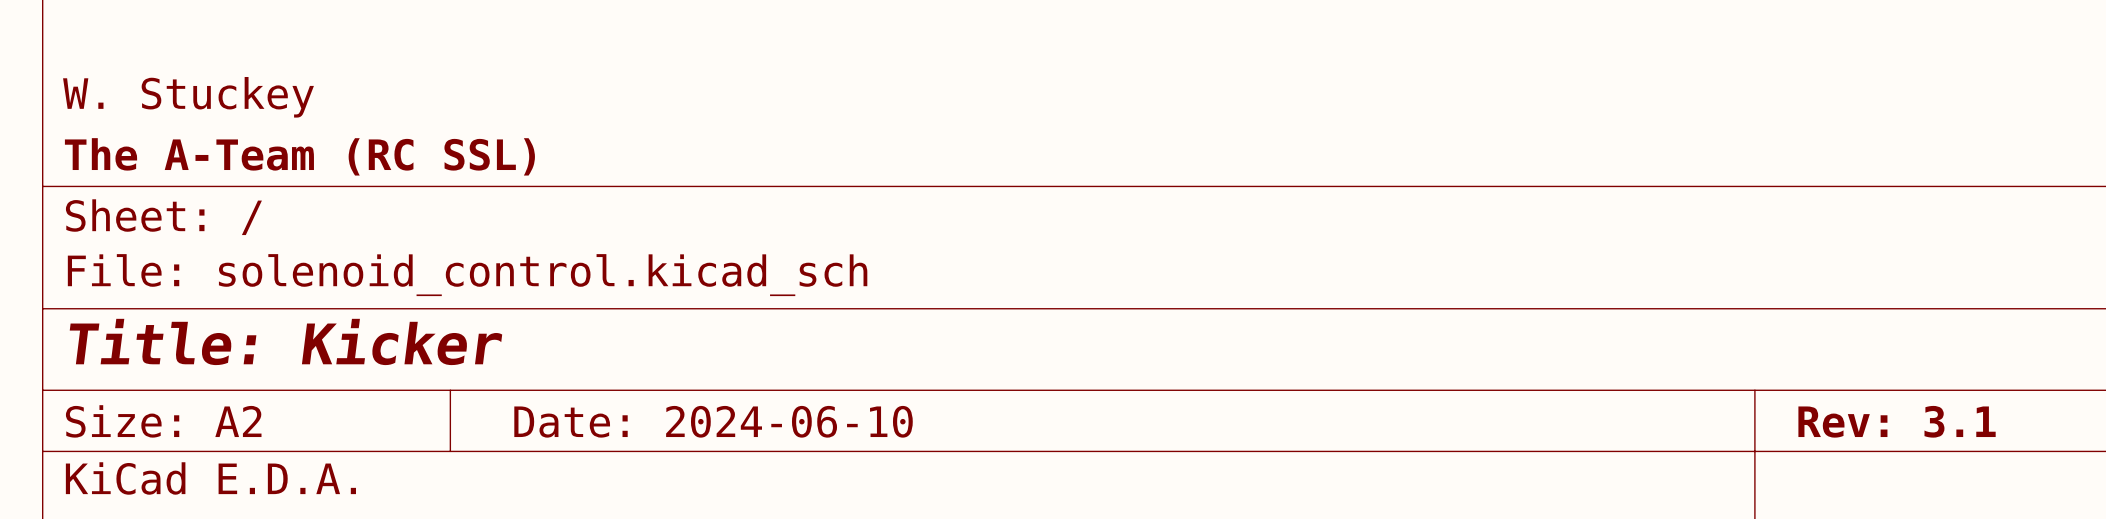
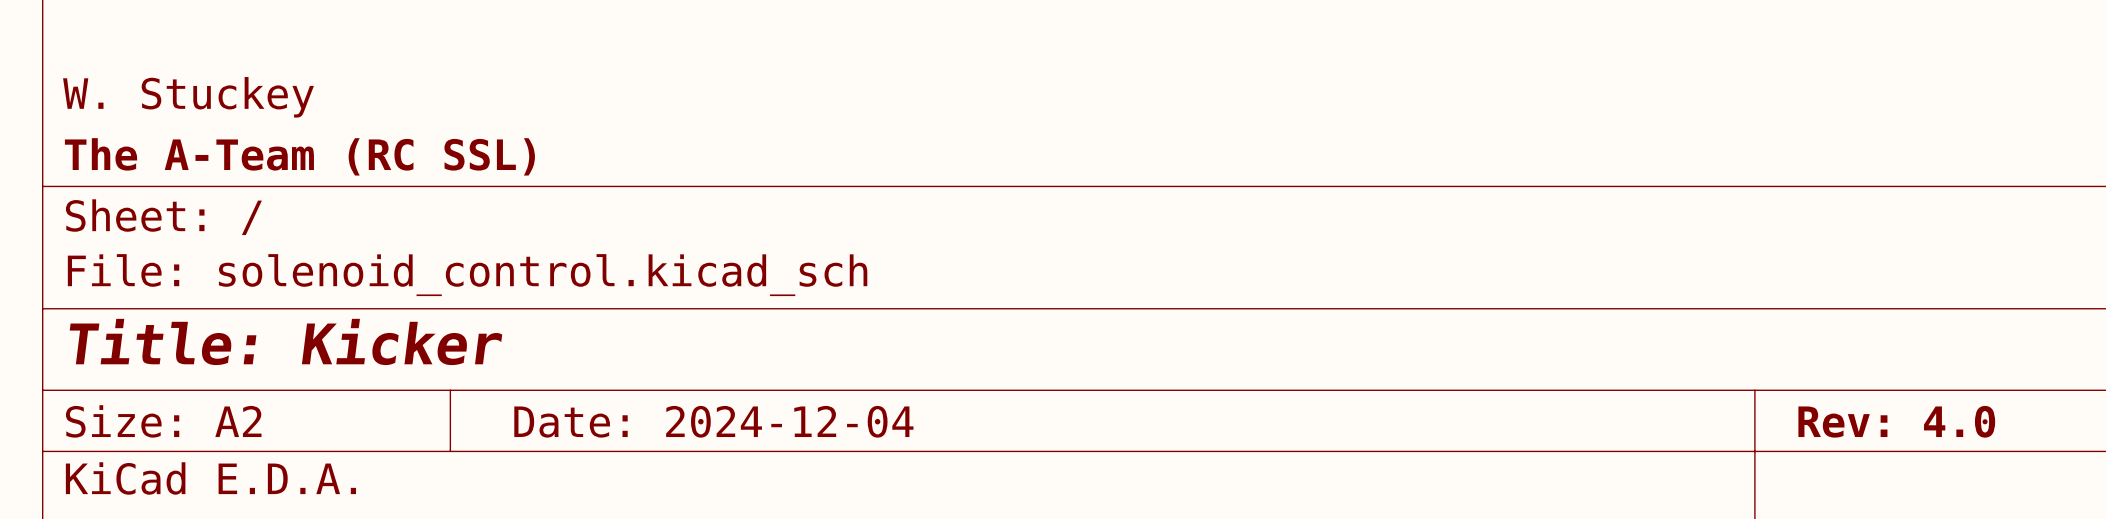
title block: Date: 2024-06-10 (713, 421) -> Date: 2024-12-04 (713, 421)
title block: Rev: 3.1 (1897, 421) -> Rev: 4.0 (1896, 421)

